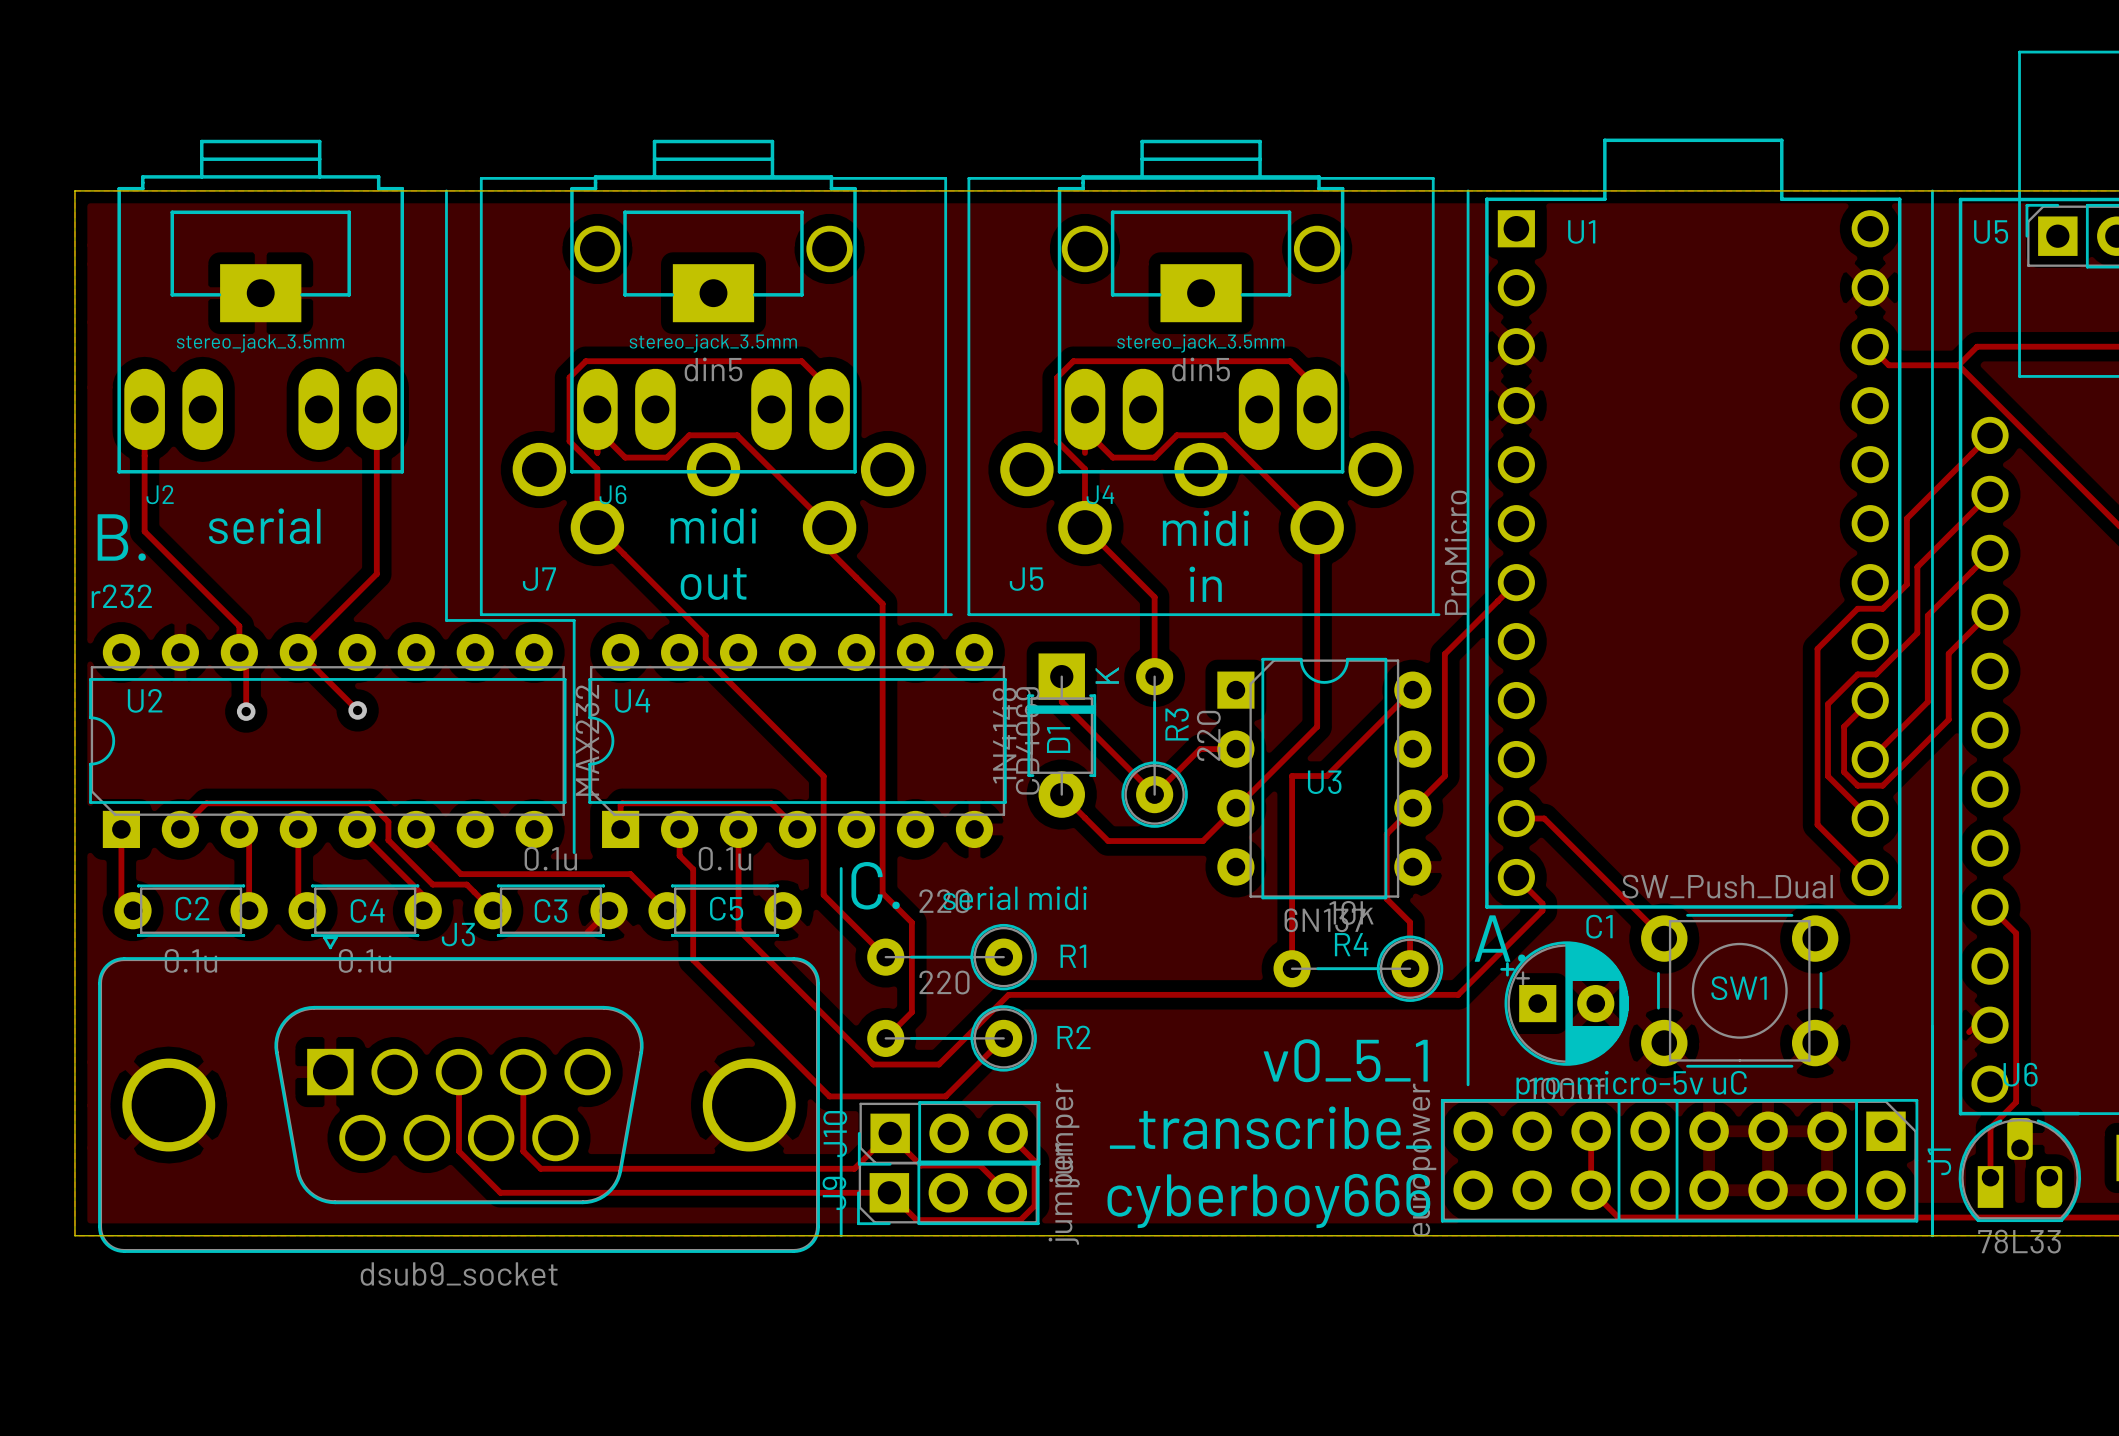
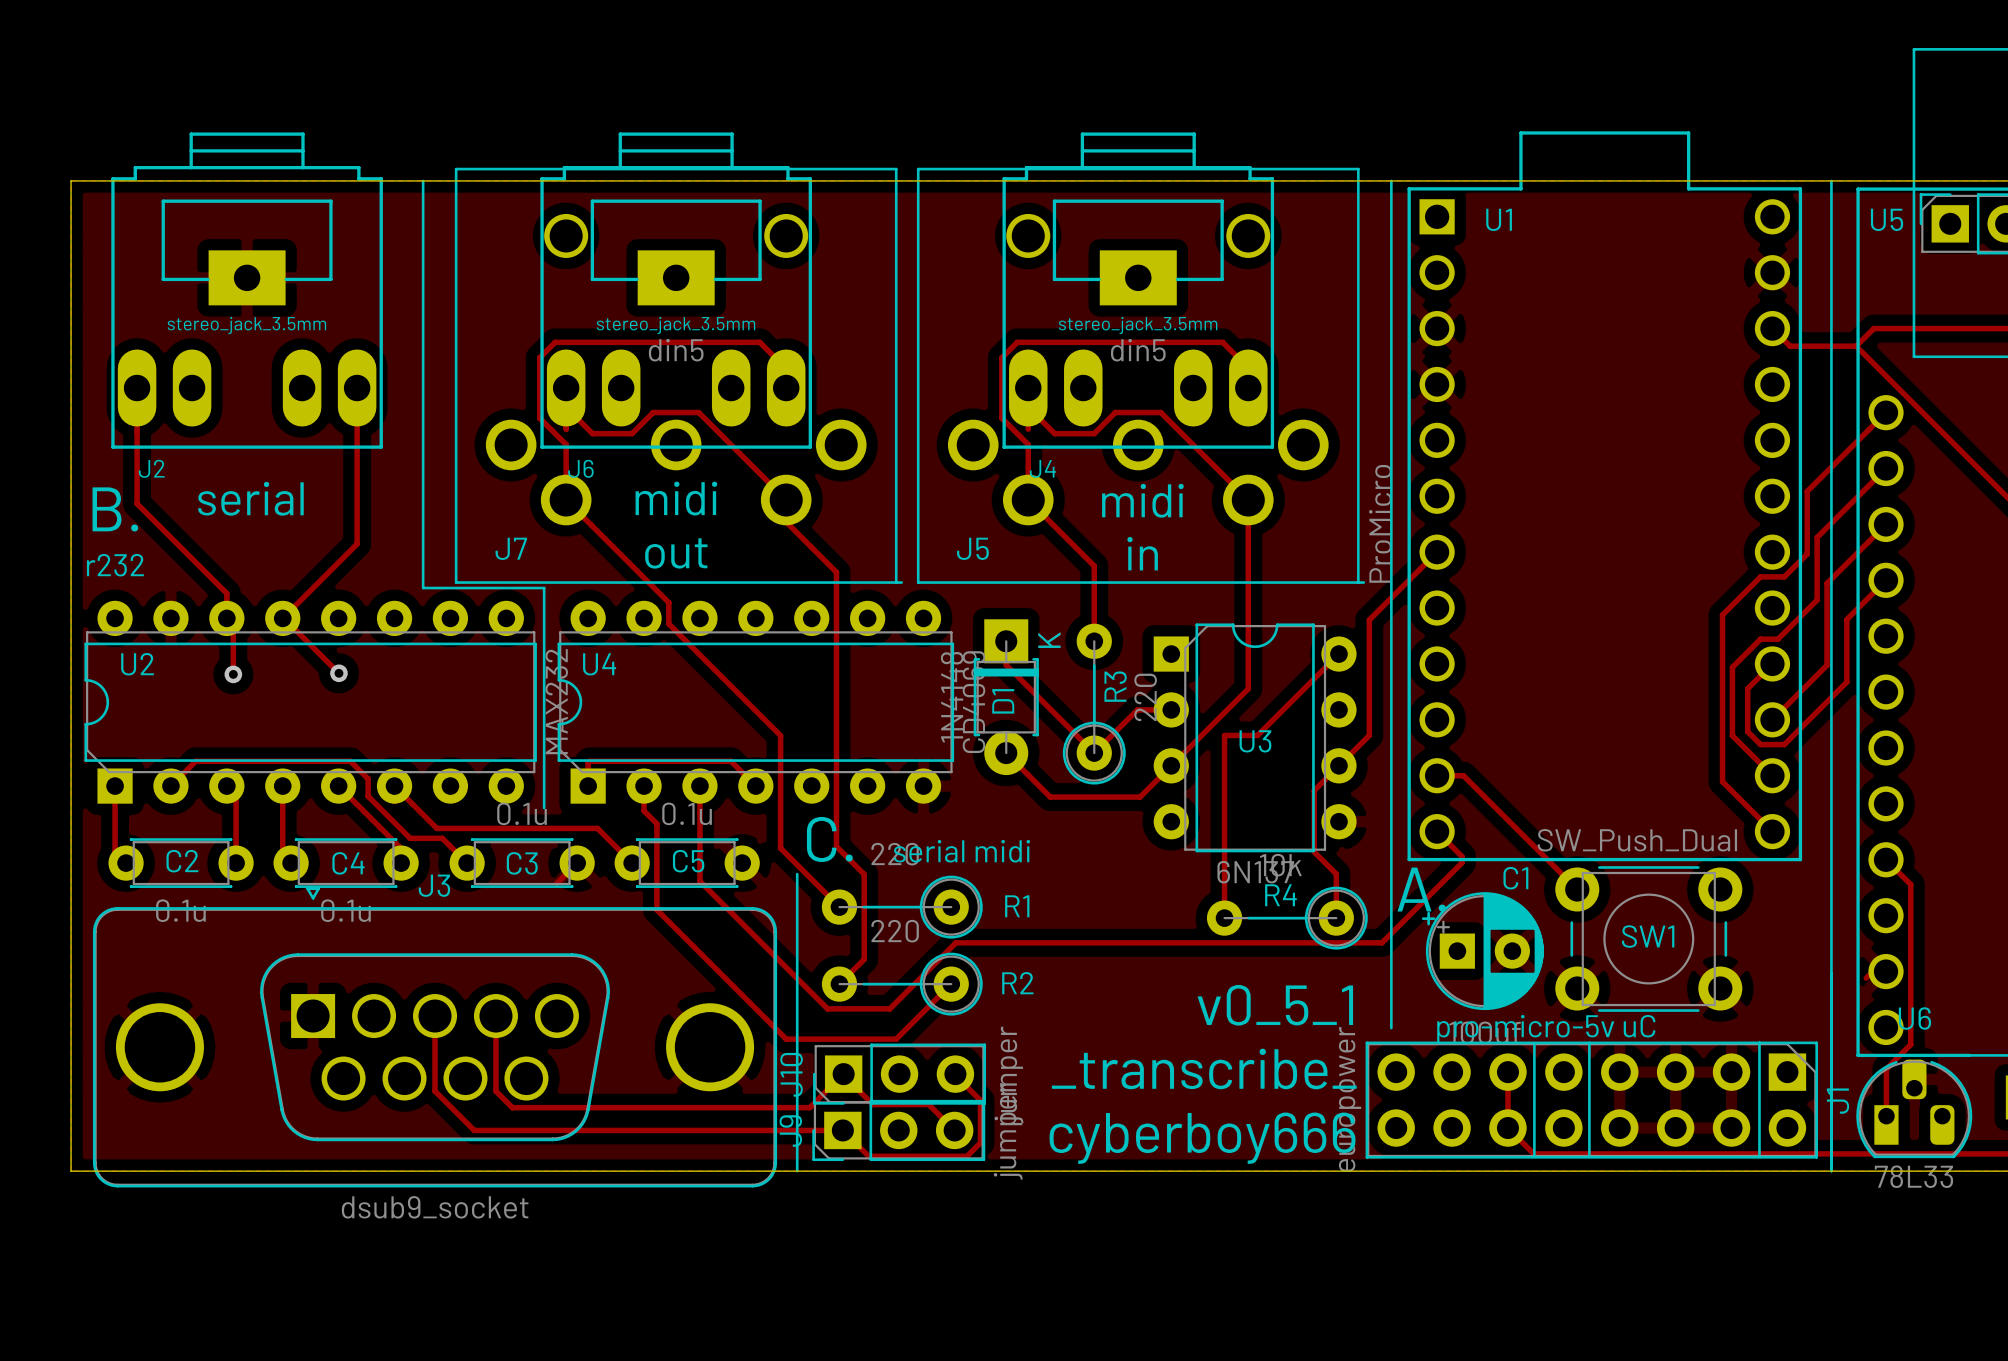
line: (841, 868) (841, 922) -> none

